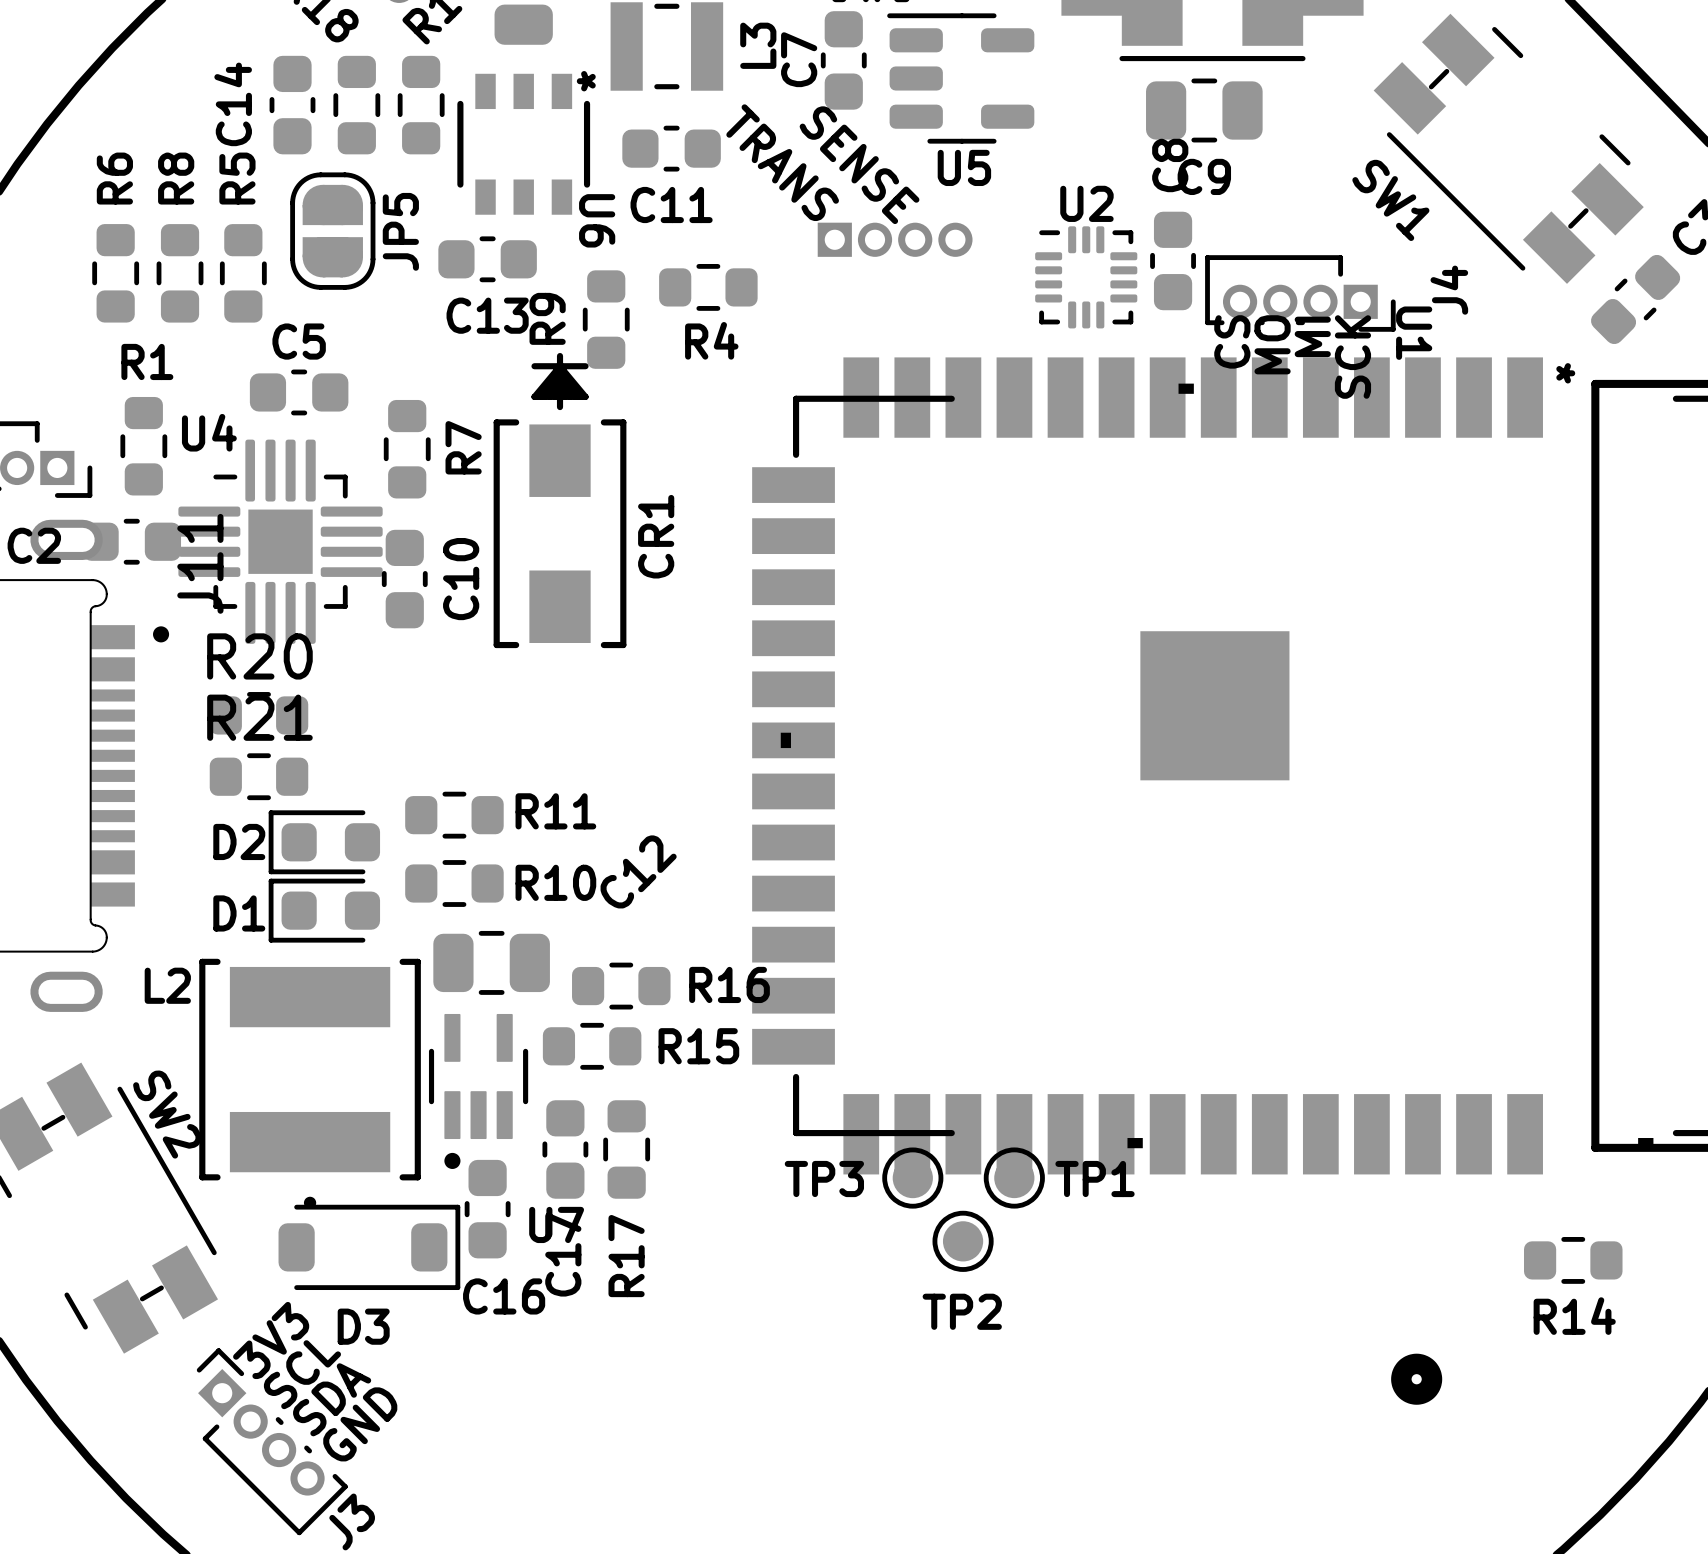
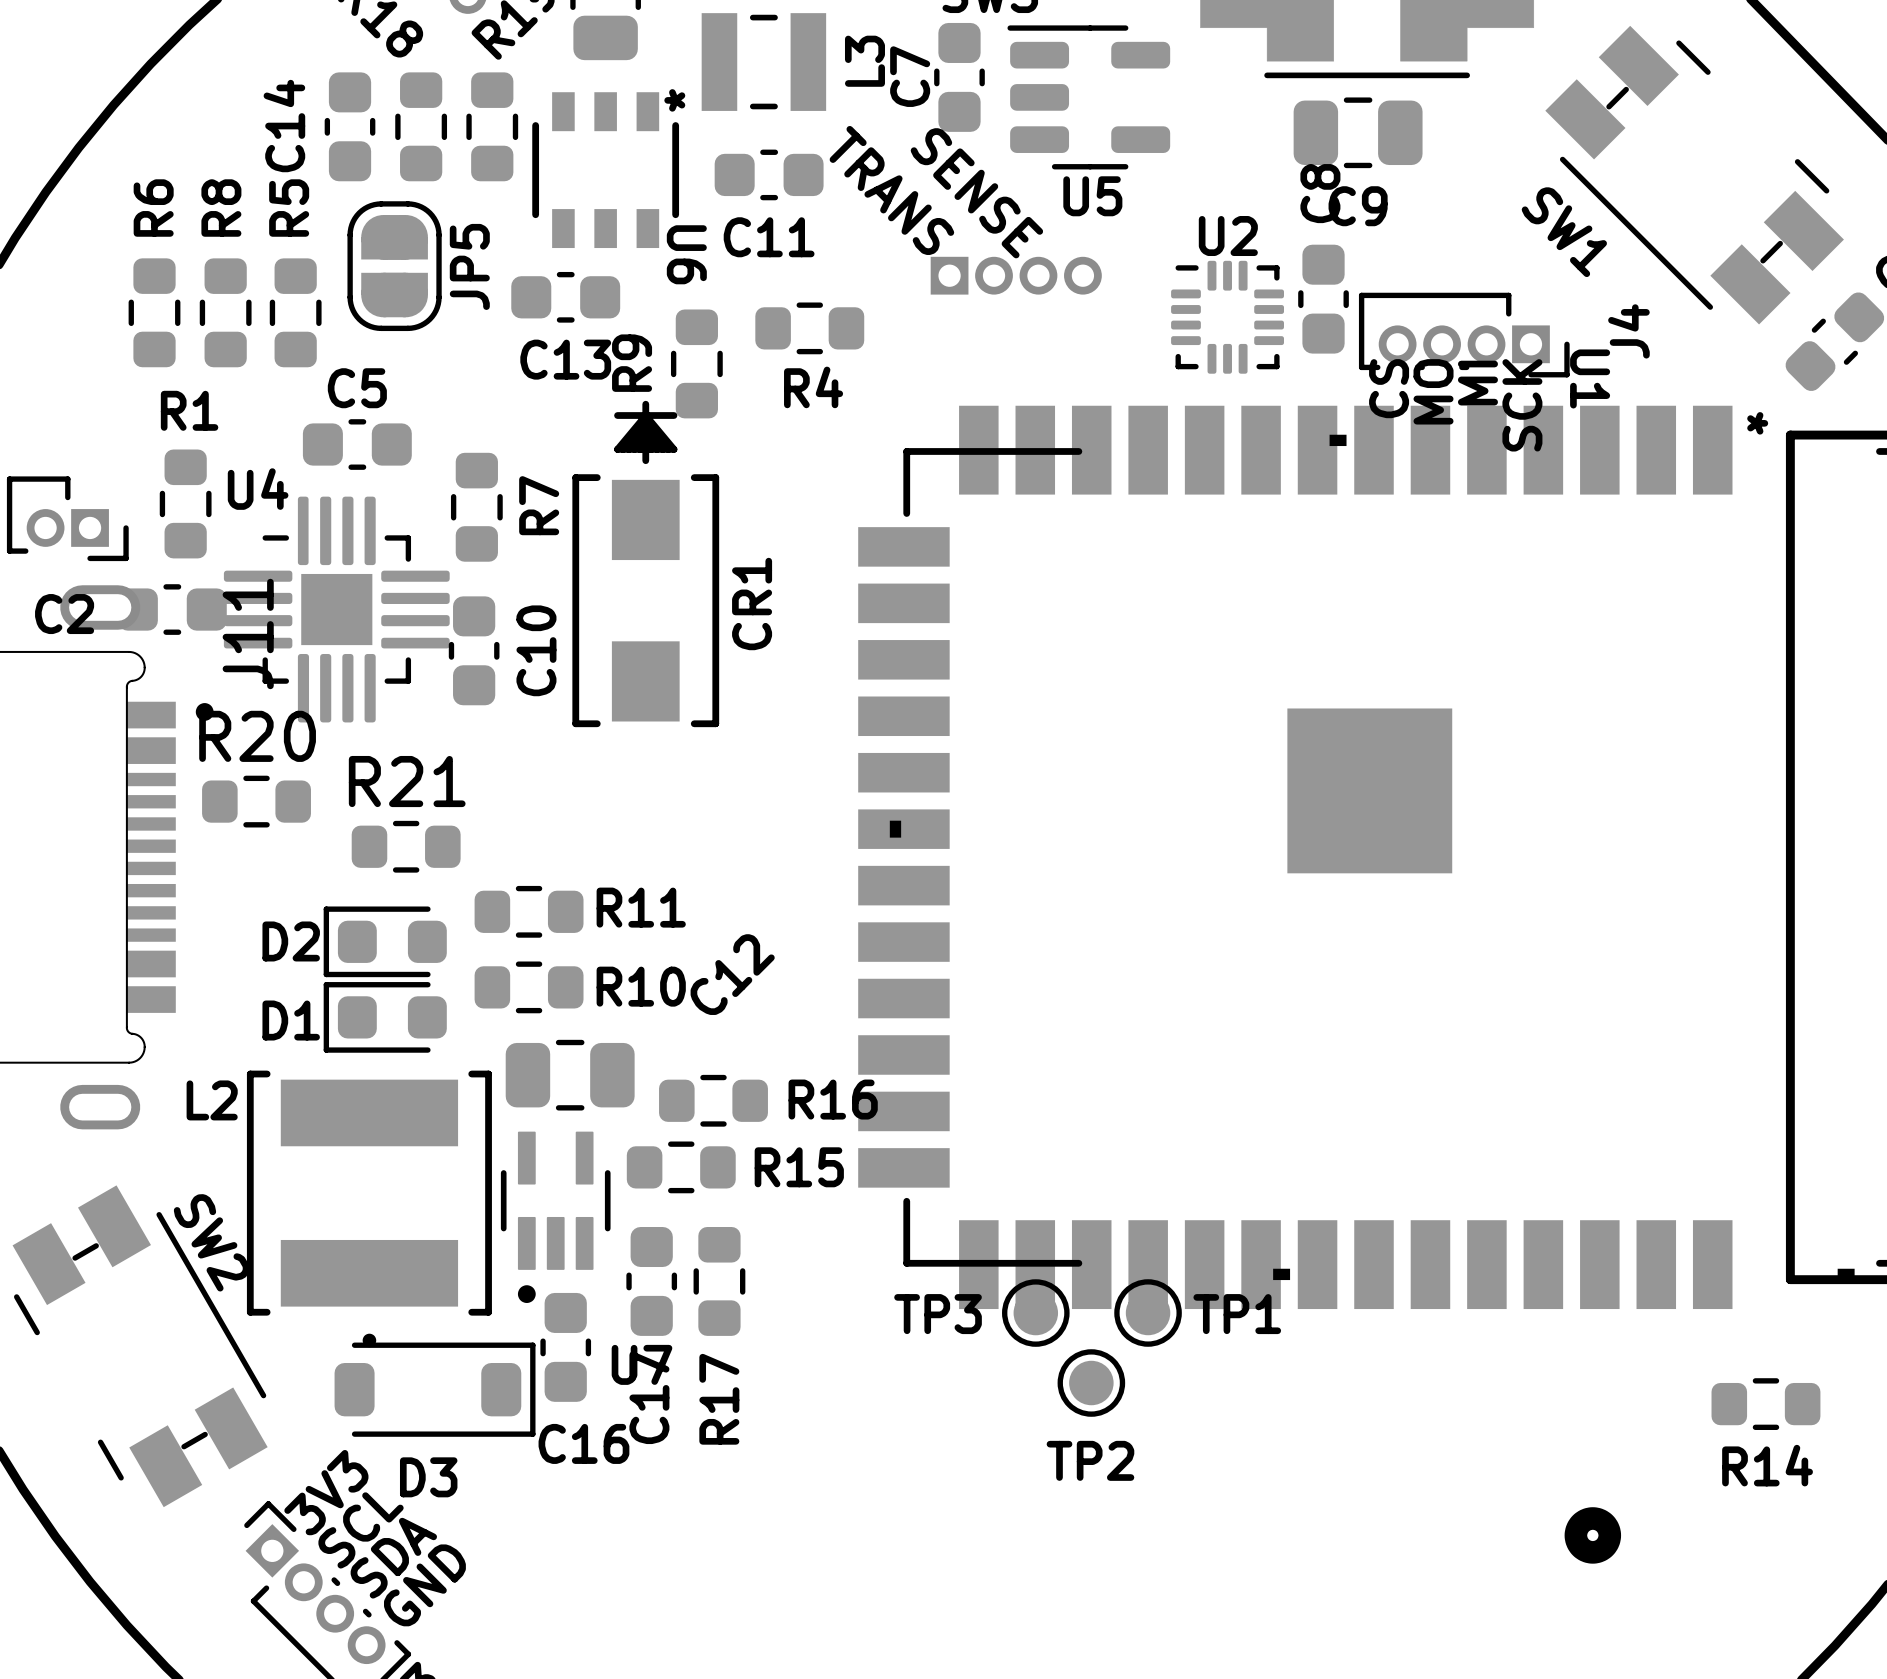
R20 position: (258, 715) -> (256, 801)
R21 position: (258, 776) -> (406, 846)

